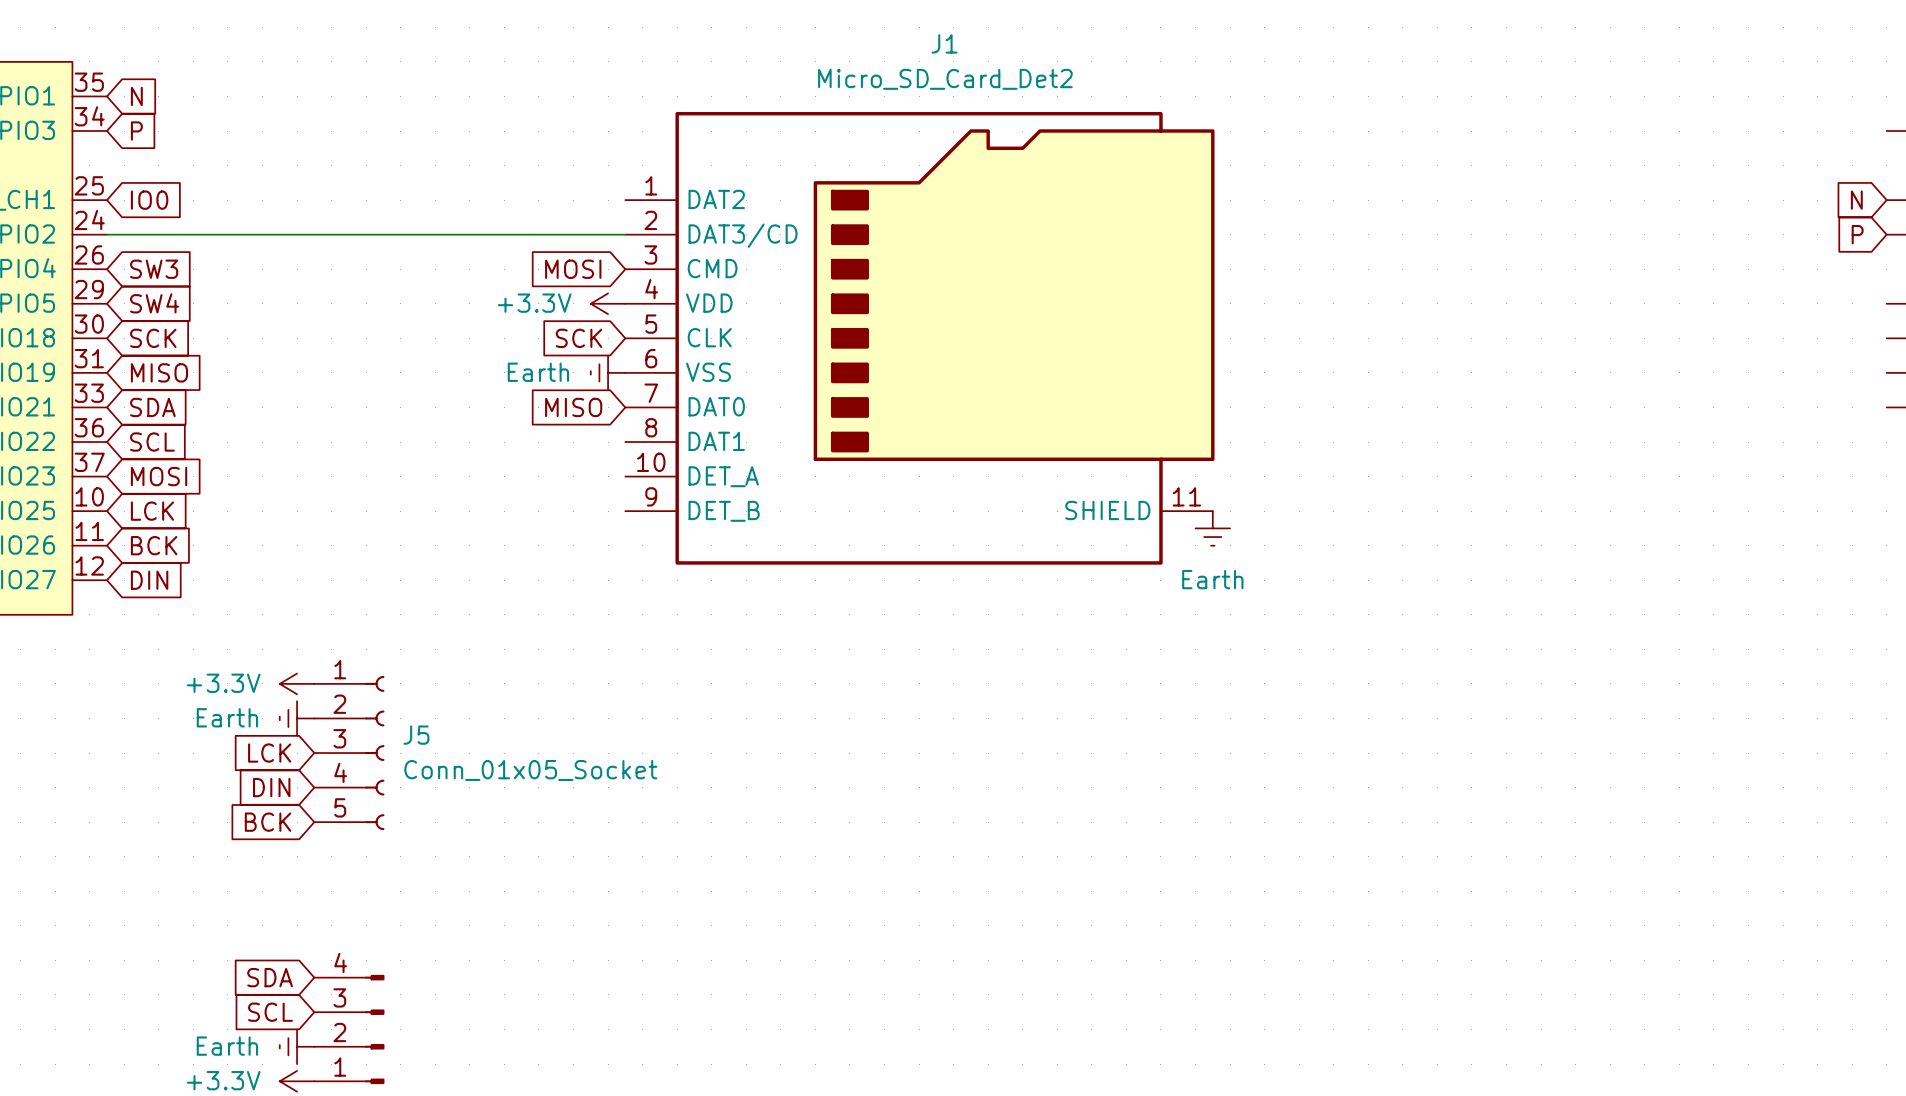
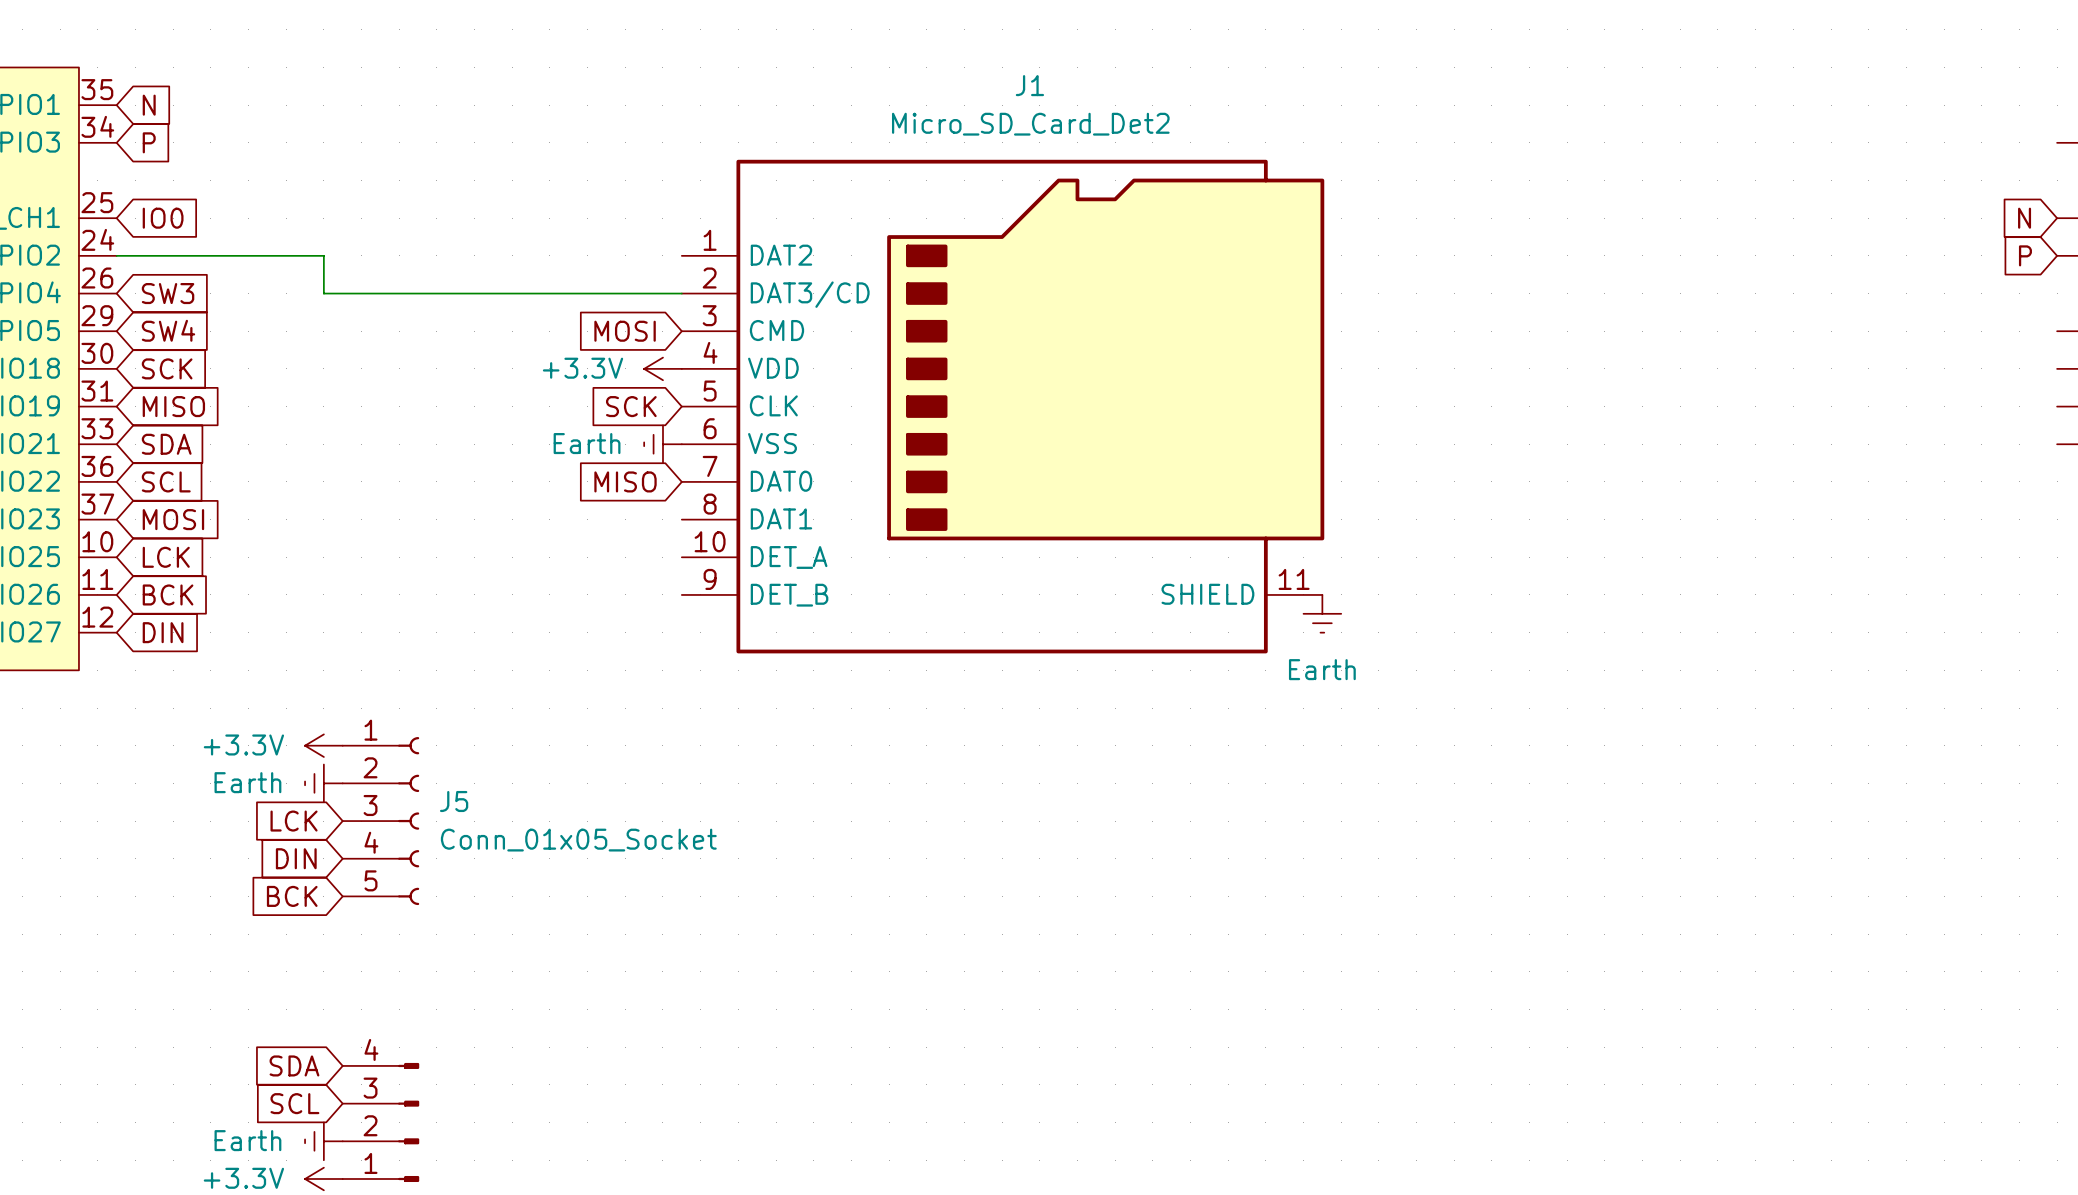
wire: (297, 234) (625, 234) -> (323, 255) (323, 293) (681, 293)
global label position: MOSI (573, 269) -> MOSI (625, 331)
power symbol position: +3.3V (608, 303) -> +3.3V (662, 368)
global label position: SCK (579, 338) -> SCK (631, 406)
J1 position: (919, 338) -> (1003, 406)
power symbol position: Earth (608, 372) -> Earth (662, 444)
global label position: MISO (573, 407) -> MISO (625, 481)
power symbol position: Earth (1212, 528) -> Earth (1322, 613)

